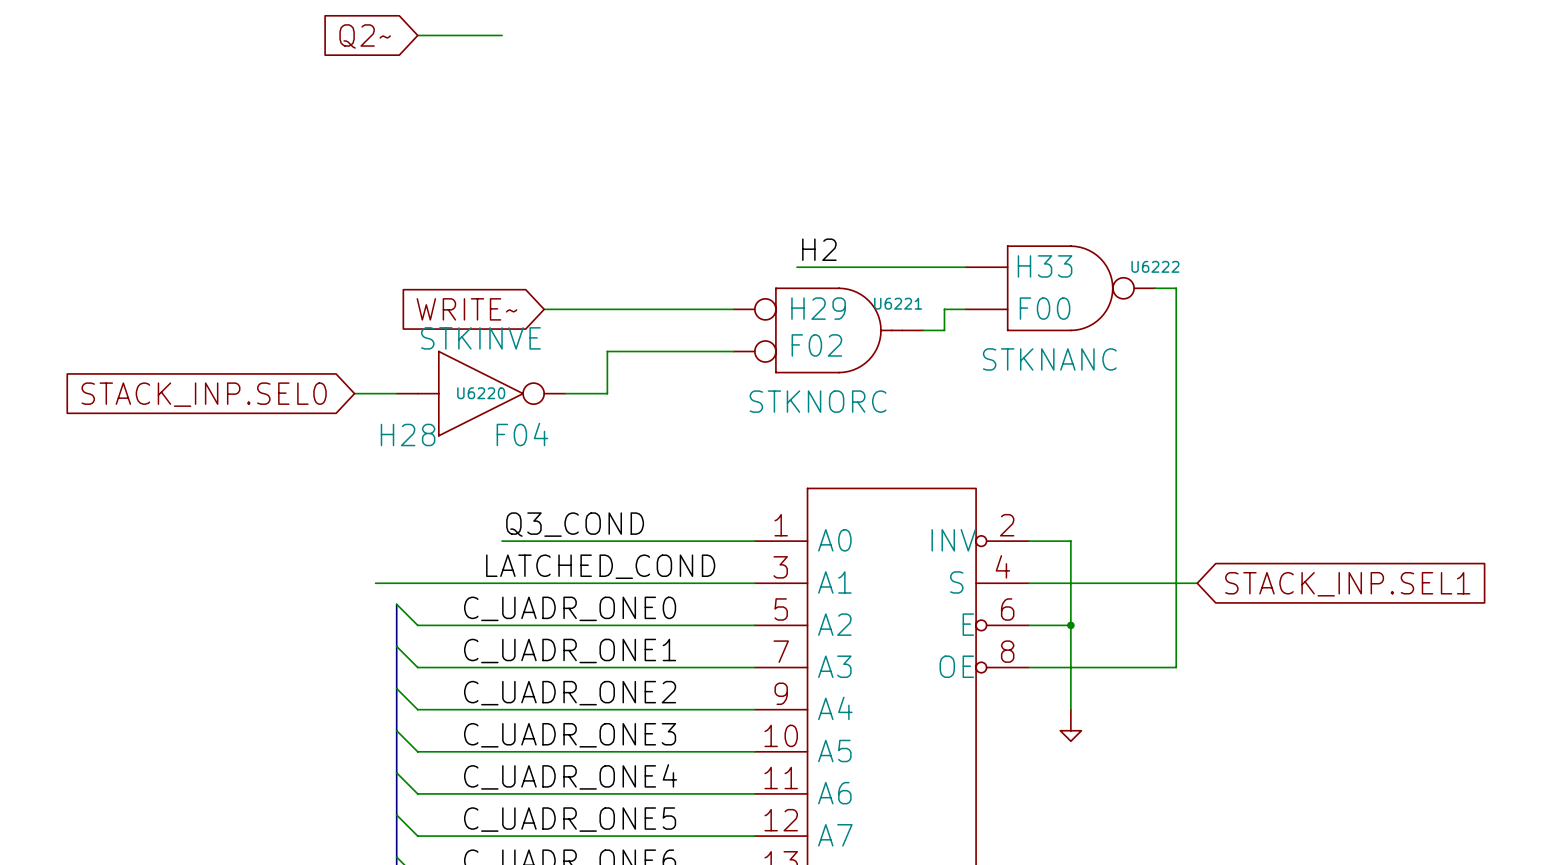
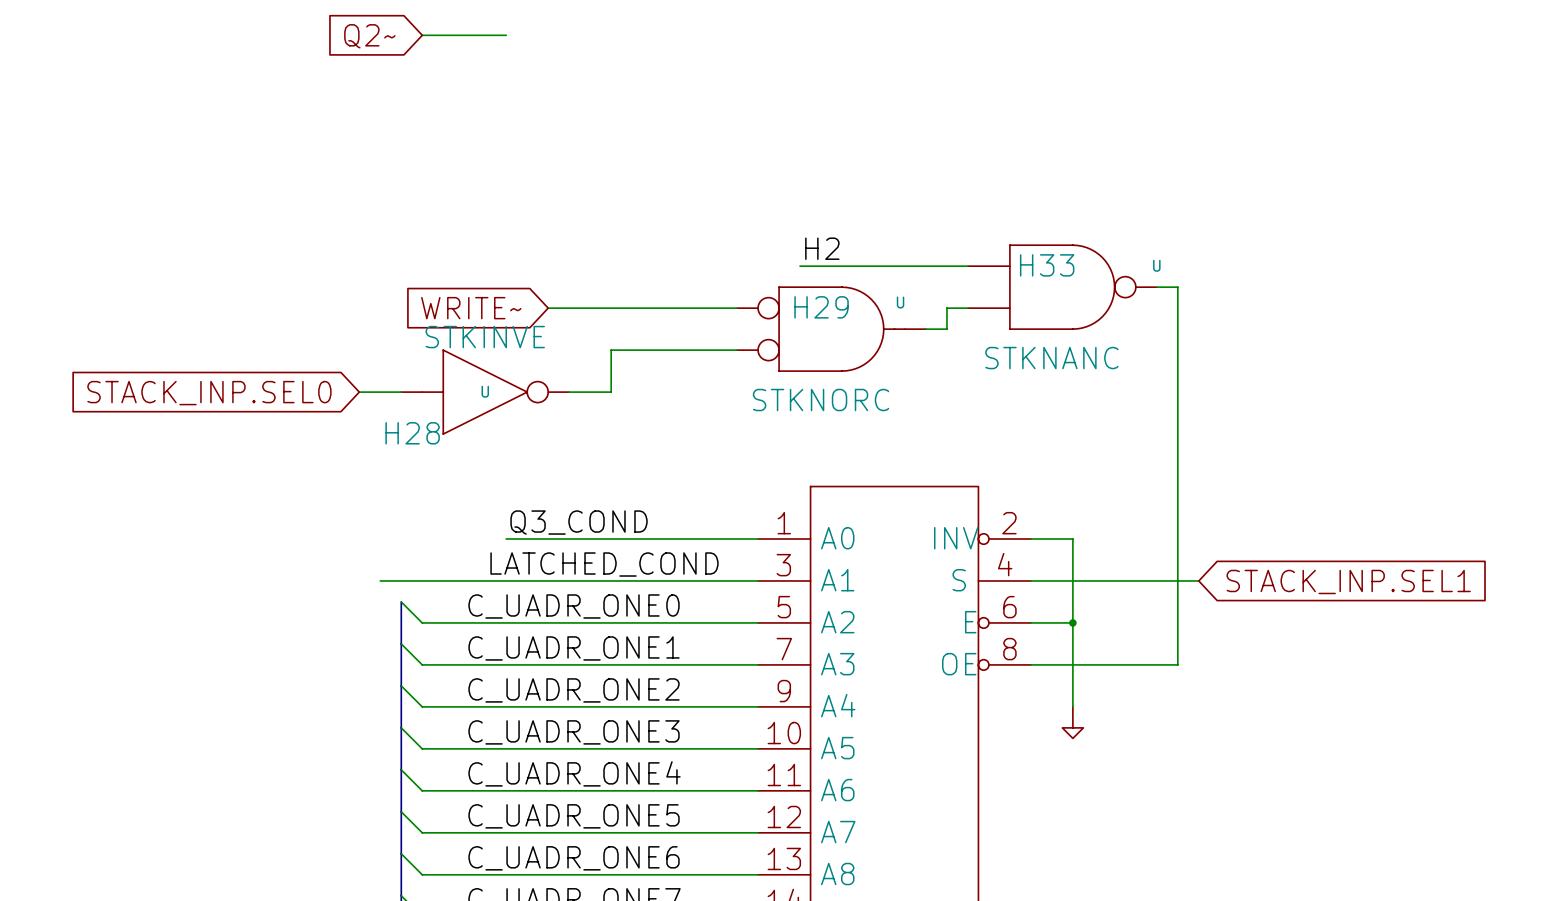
U6222 name: U6222 (1155, 266) -> U (1156, 265)
U6221 name: U6221 (898, 303) -> U (900, 302)
U6222 value: F00 (1045, 308) -> none
U6221 value: F02 (816, 345) -> none
U6220 name: U6220 (481, 393) -> U (485, 391)
U6220 value: F04 (522, 434) -> none

